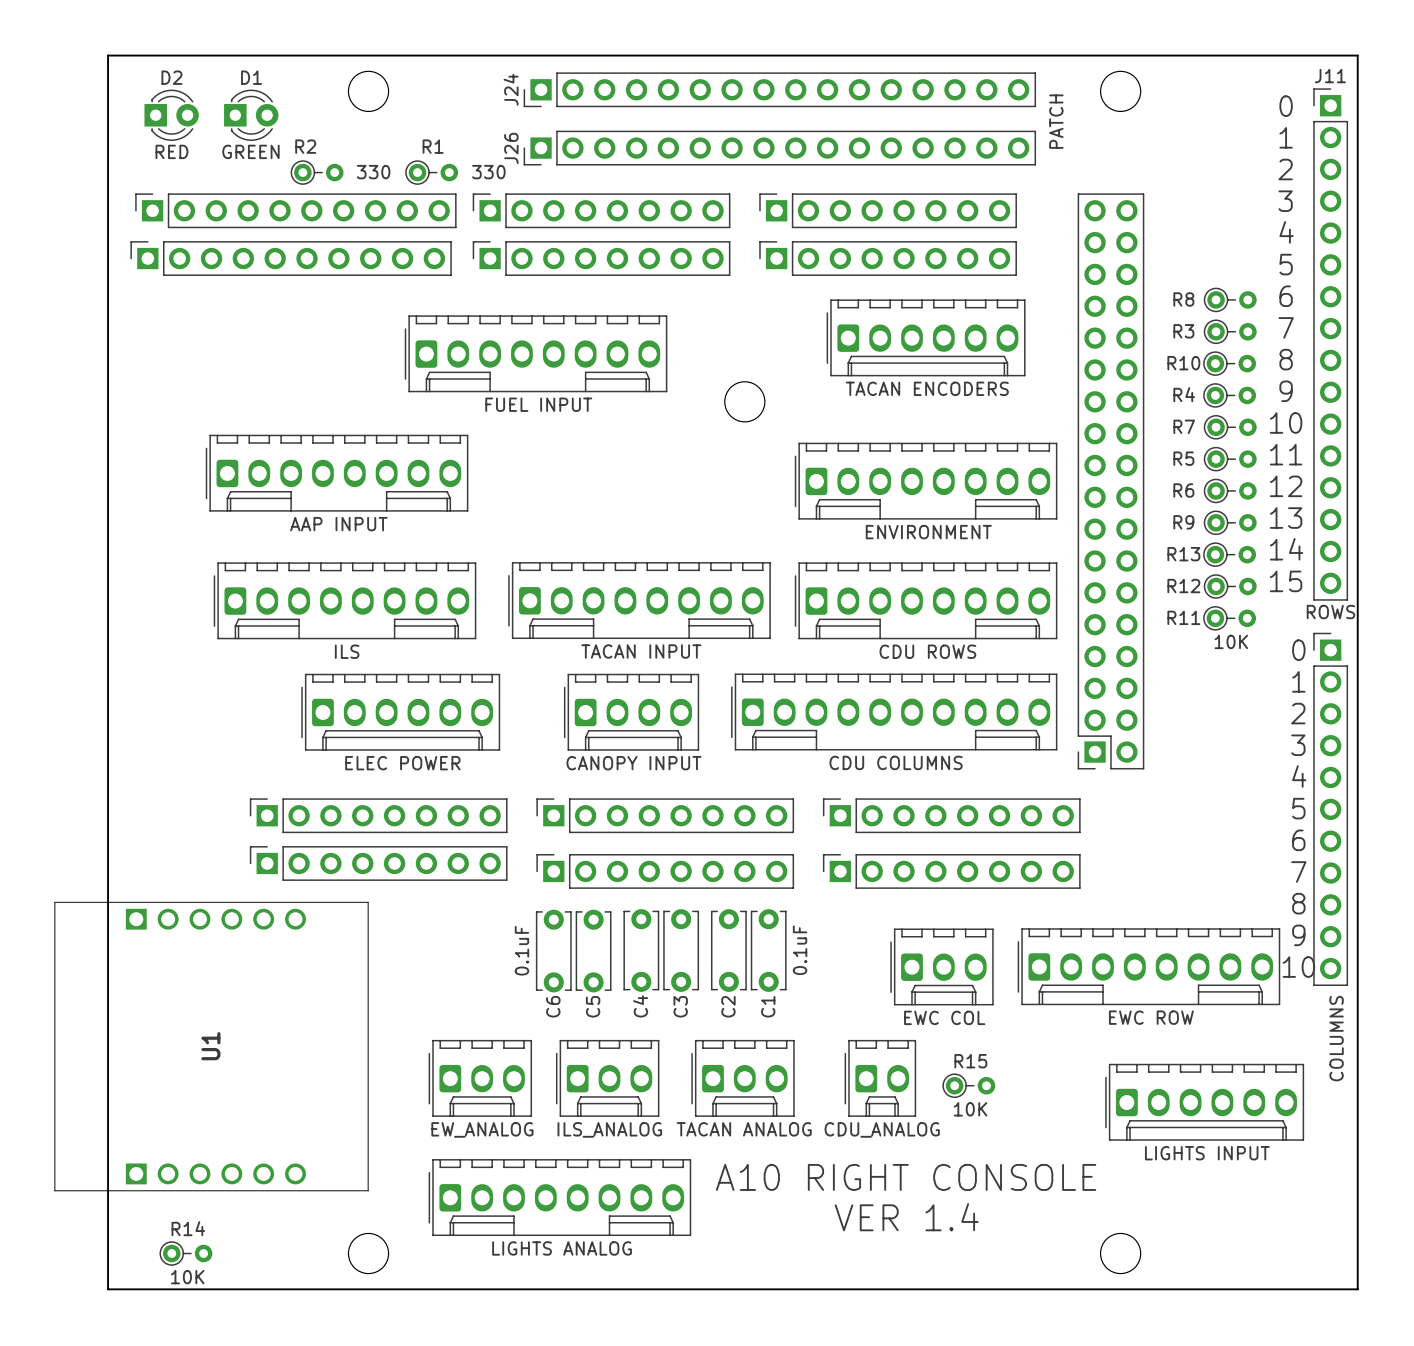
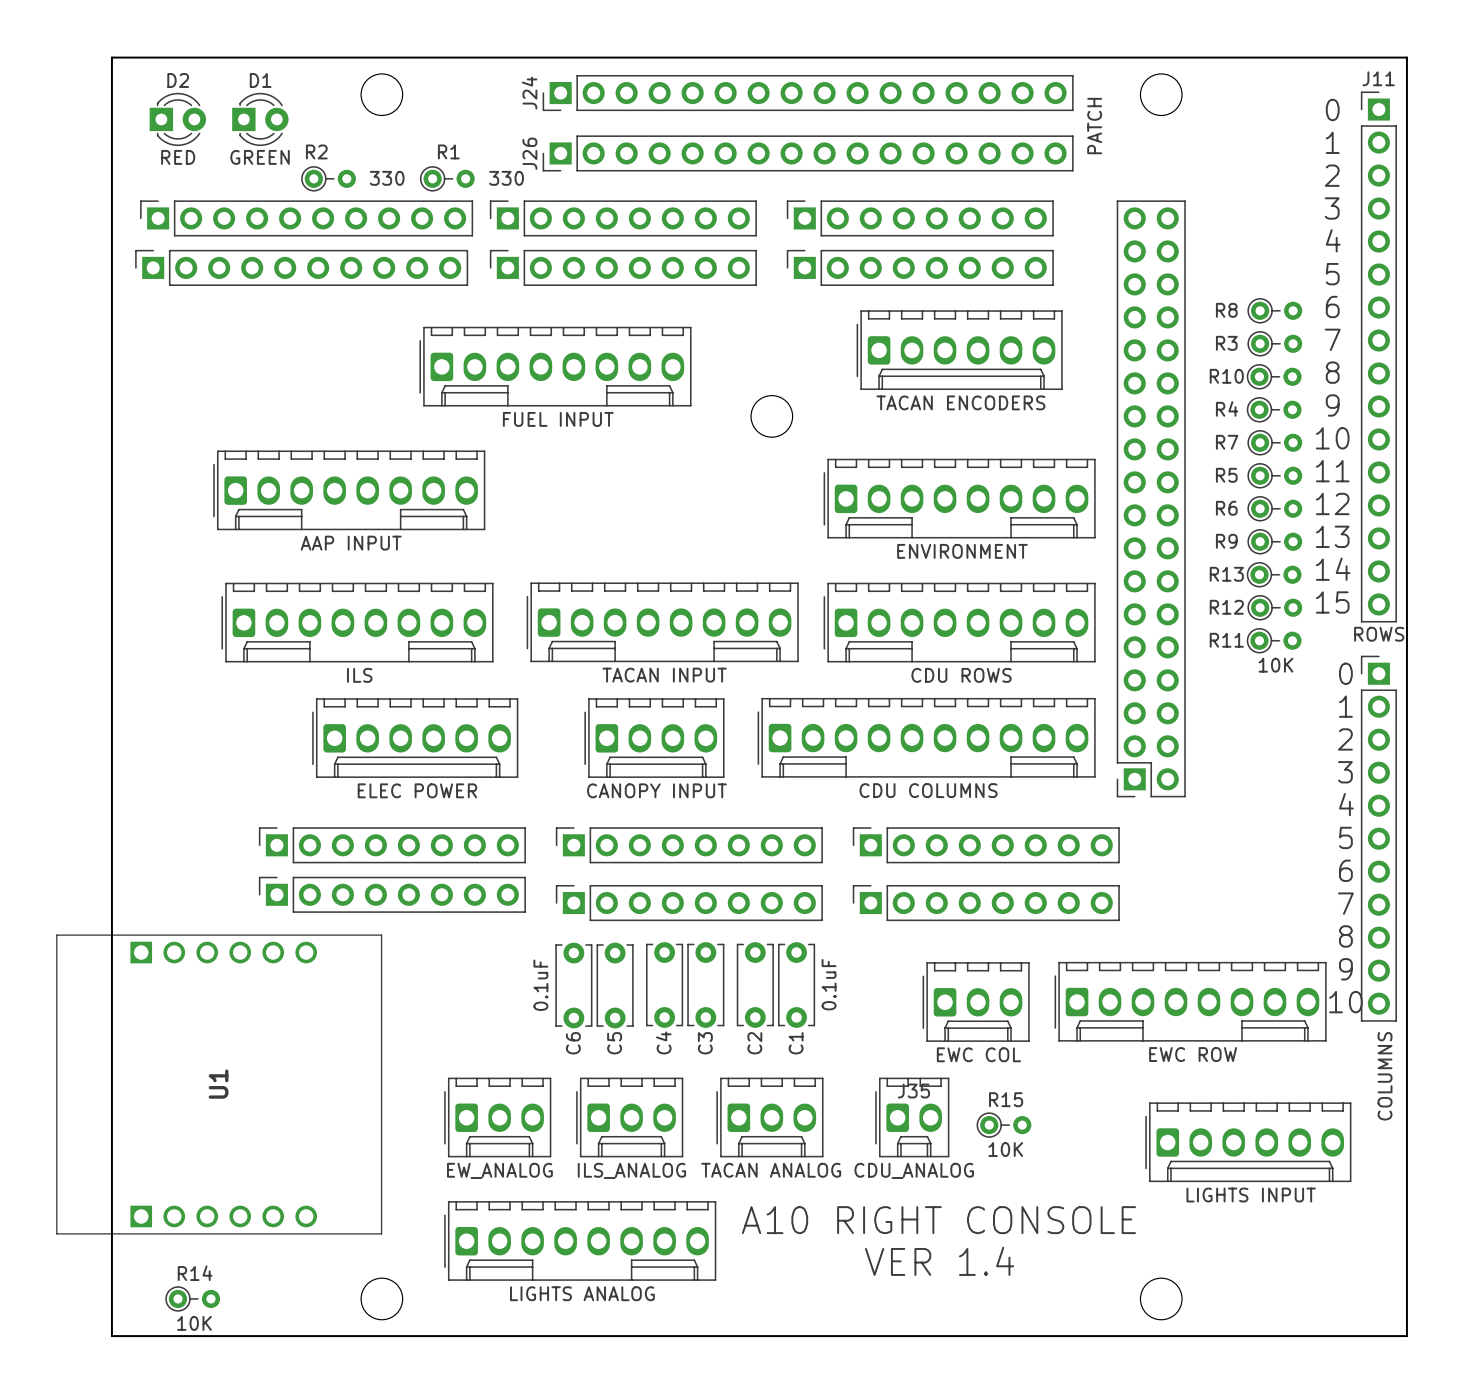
J35 name: none -> J35 (913, 1091)

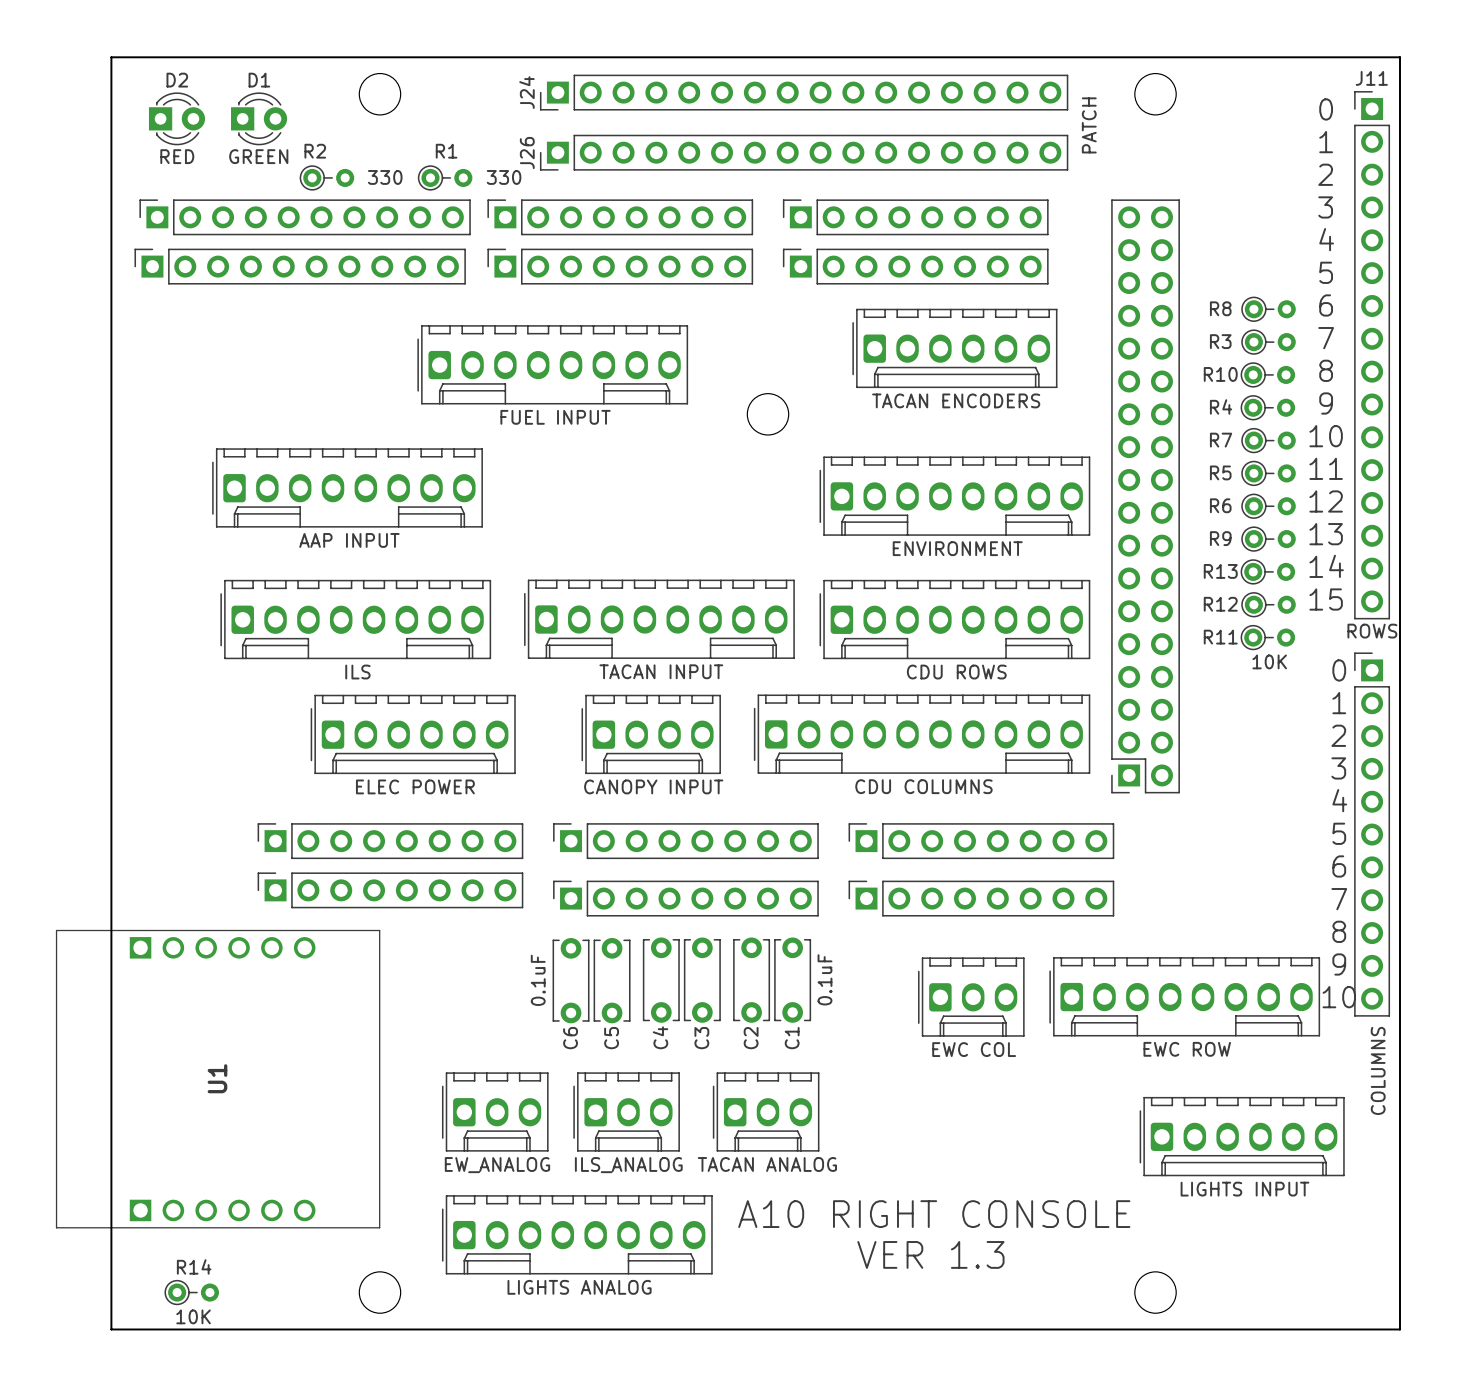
J35: CDU_ANALOG (912, 1117) -> none
R15: 10K (1003, 1125) -> none
text: VER 1.4 (939, 1261) -> VER 1.3 (930, 1254)

